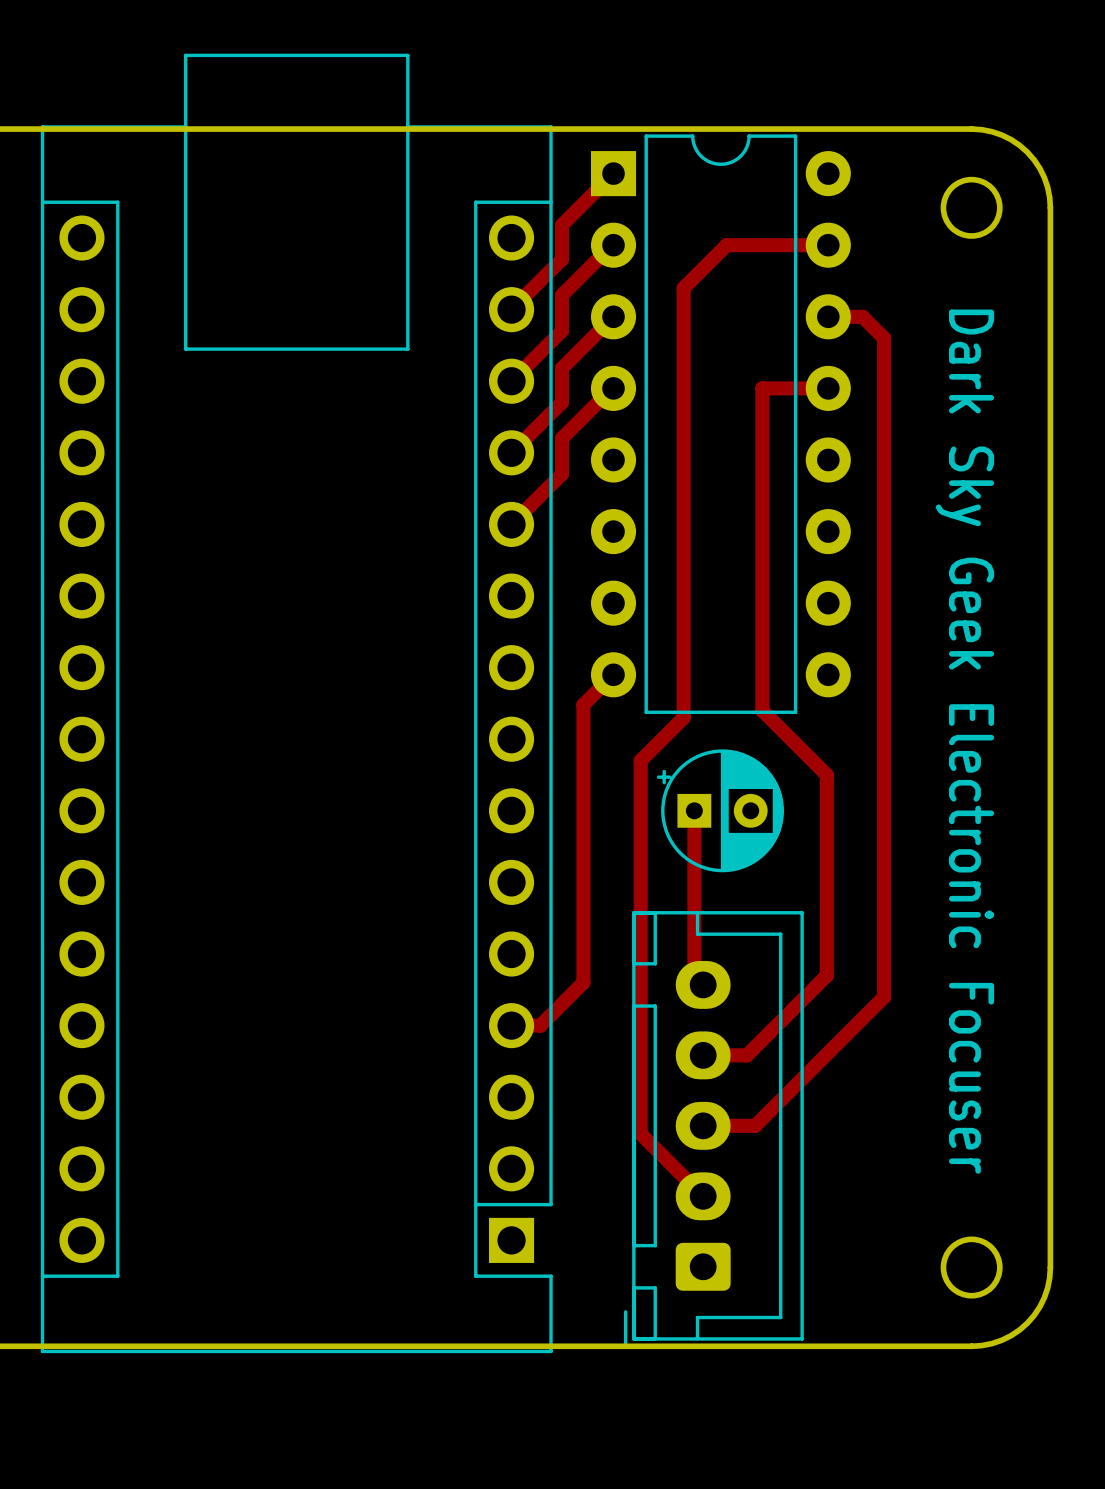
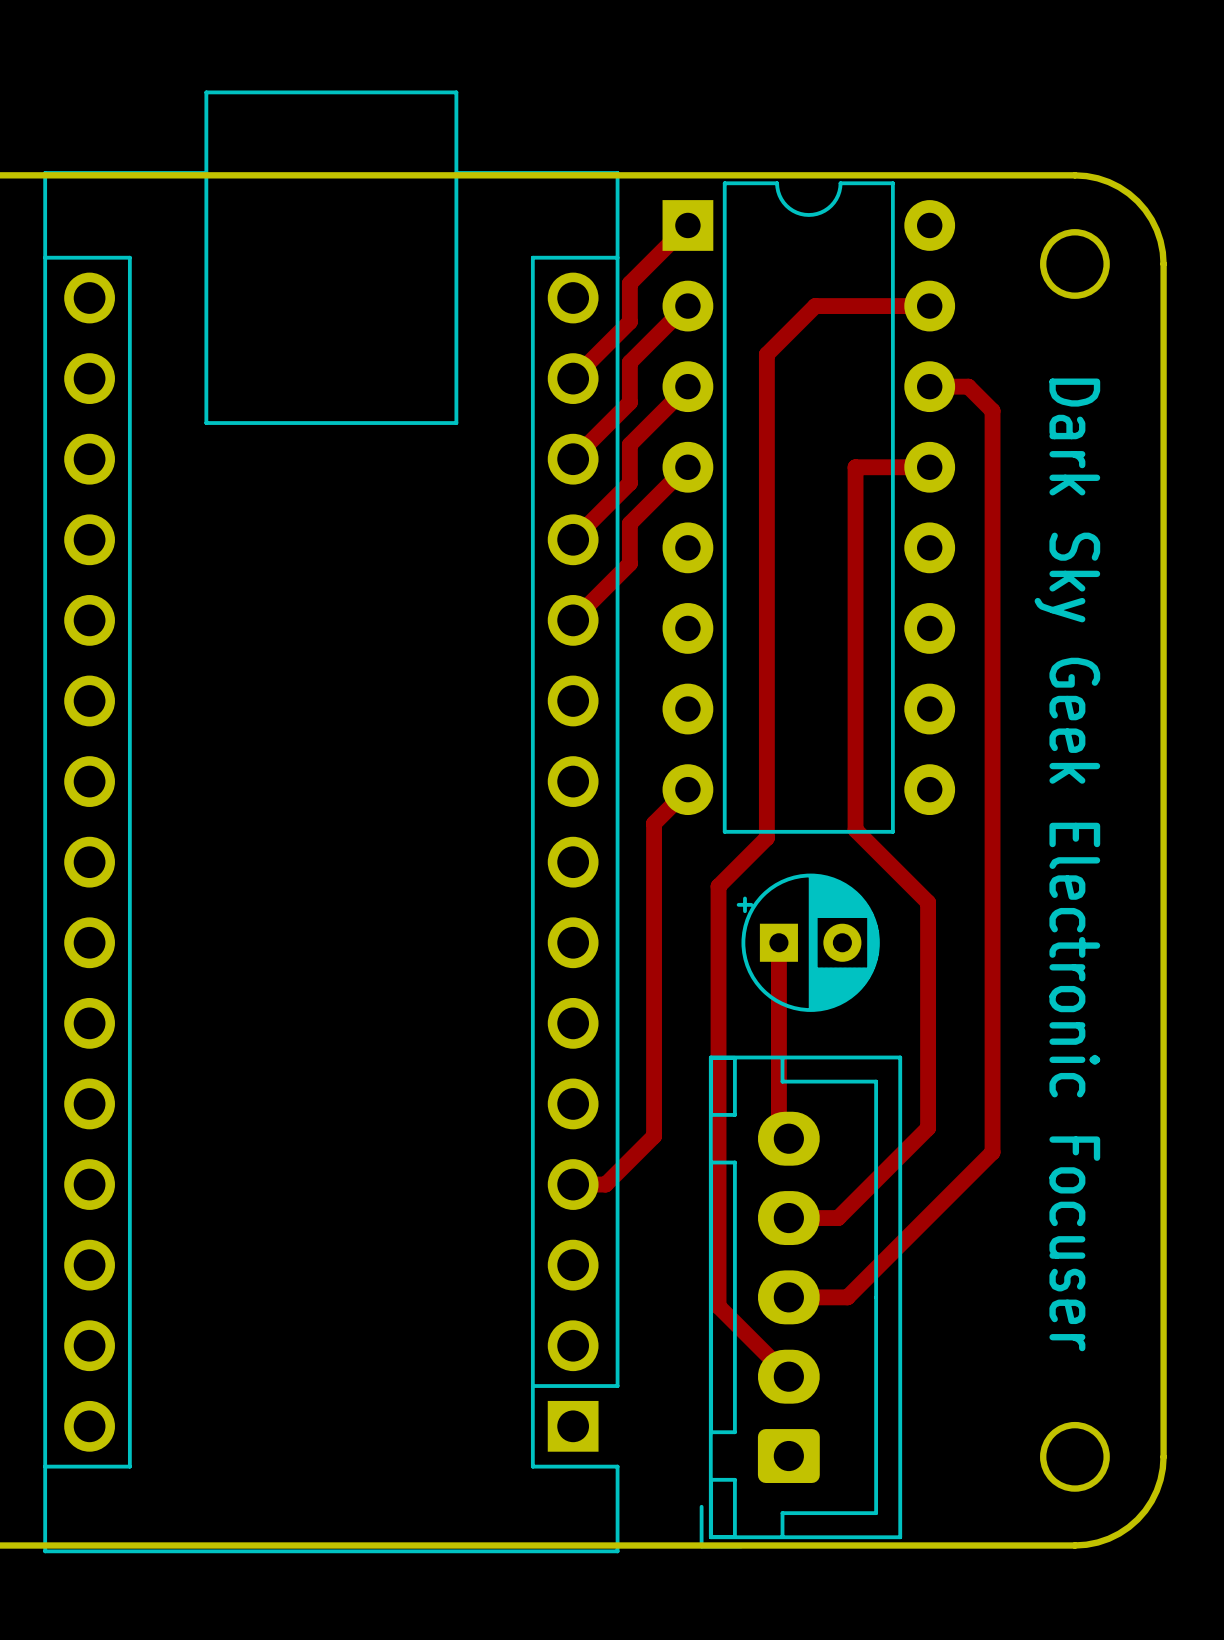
board edge: (957, 129) (992, 131) (1019, 145) (1039, 168) (1047, 187) (1050, 207) (1049, 1277) (1039, 1306) (1019, 1330) (992, 1343) (957, 1346) -> (1074, 175) (1086, 176) (1108, 182) (1119, 187) (1137, 201) (1145, 210) (1156, 230) (1160, 241) (1163, 263) (1162, 1468) (1160, 1479) (1151, 1501) (1137, 1519) (1128, 1527) (1119, 1533) (1097, 1542) (1074, 1545)
round board edge position: (971, 207) -> (1074, 263)
text position: Dark Sky Geek Electronic Focuser (964, 741) -> Dark Sky Geek Electronic Focuser (1067, 864)
round board edge position: (971, 1267) -> (1074, 1456)

